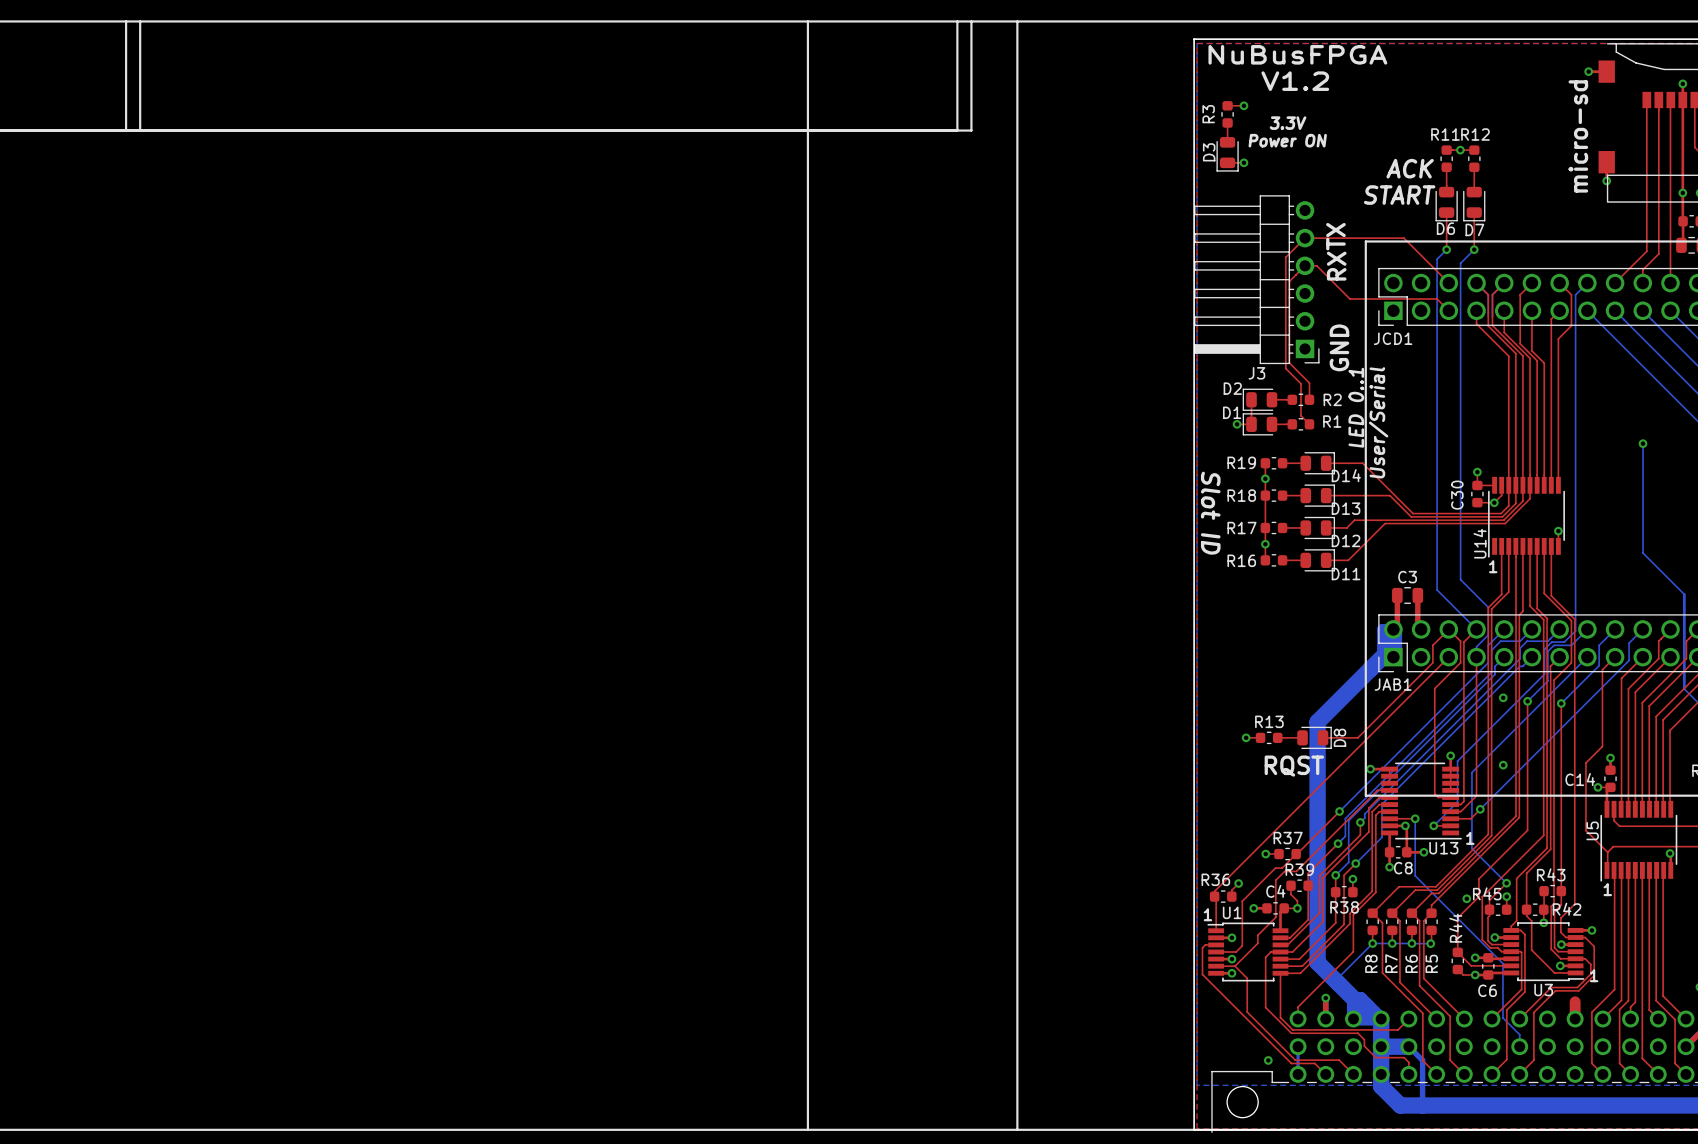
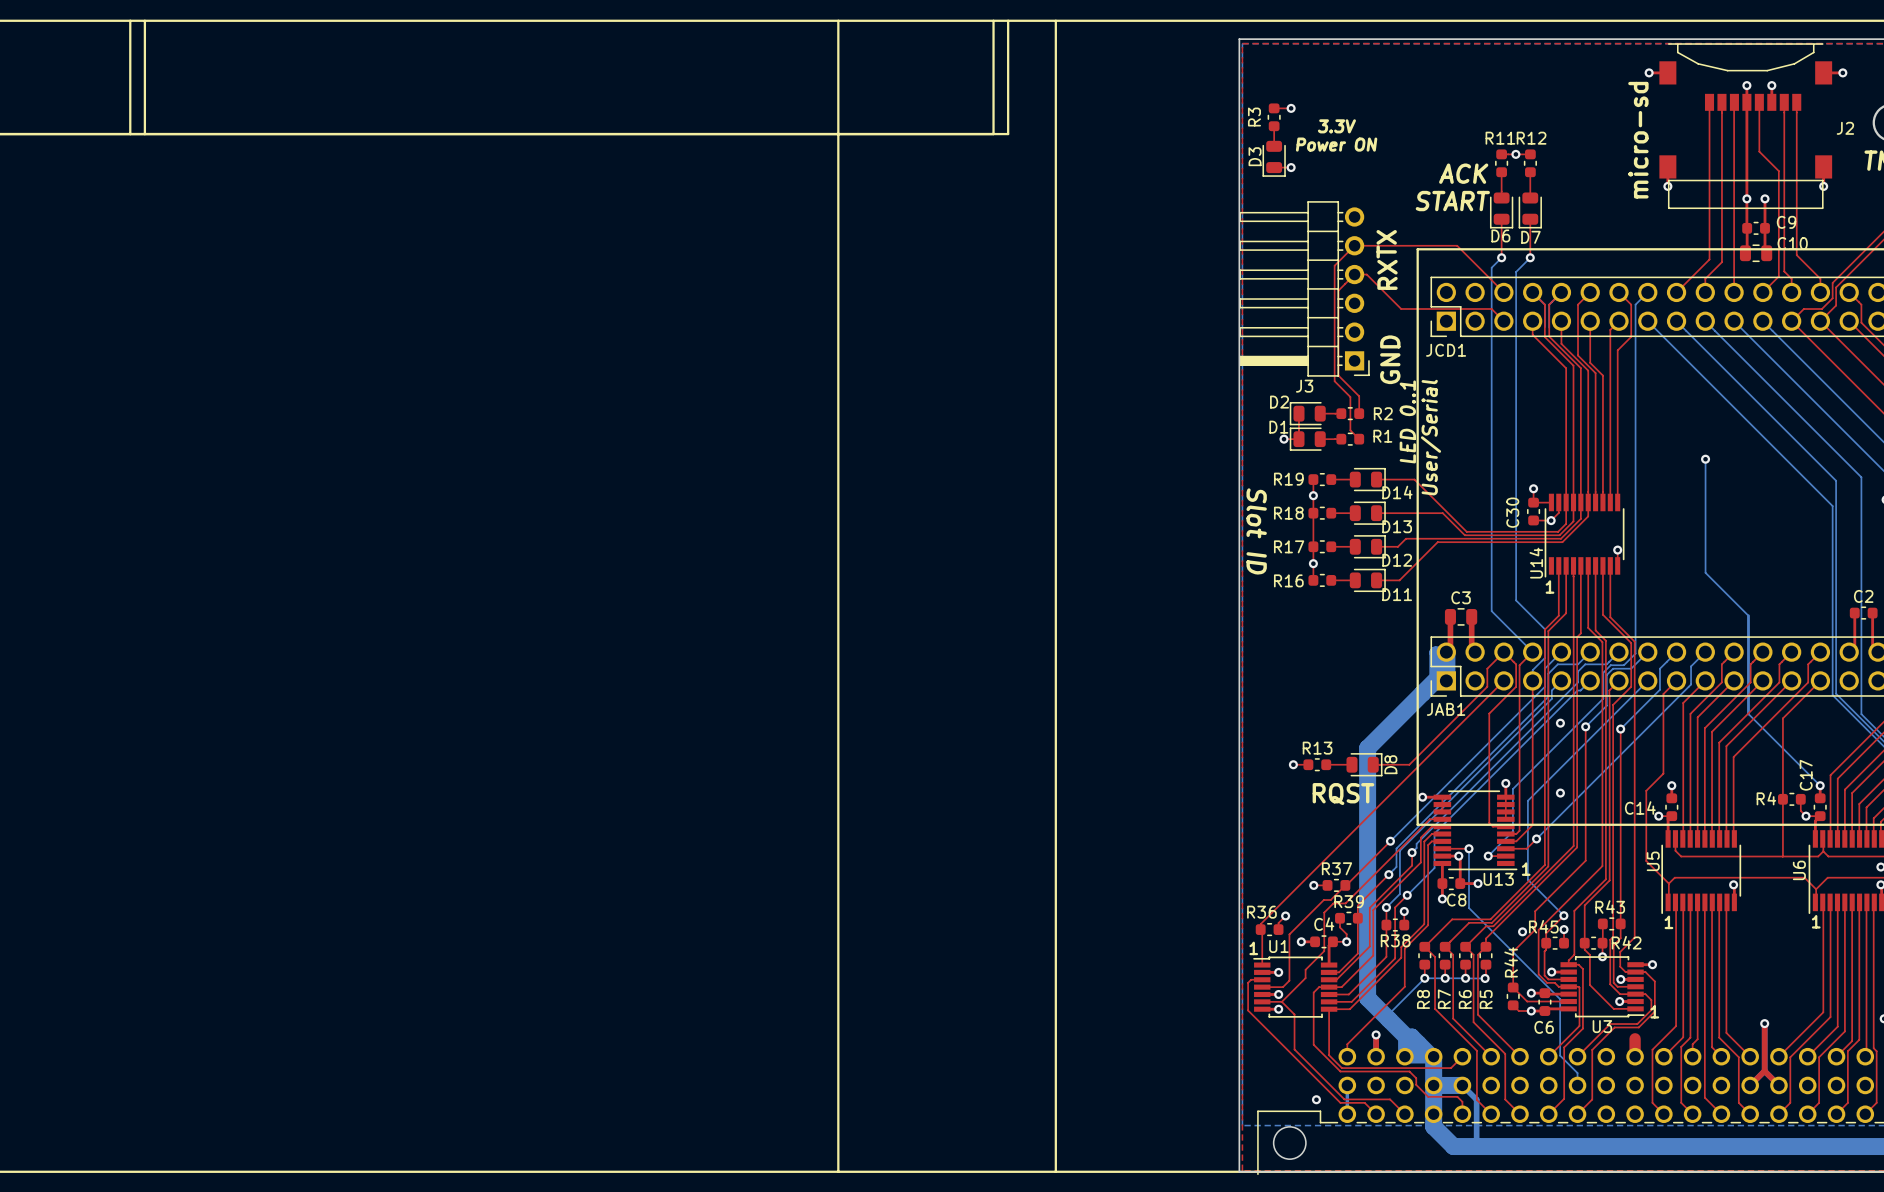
text: NuBusFPGA (1297, 54) -> none
text: V1.2 (1295, 81) -> none

